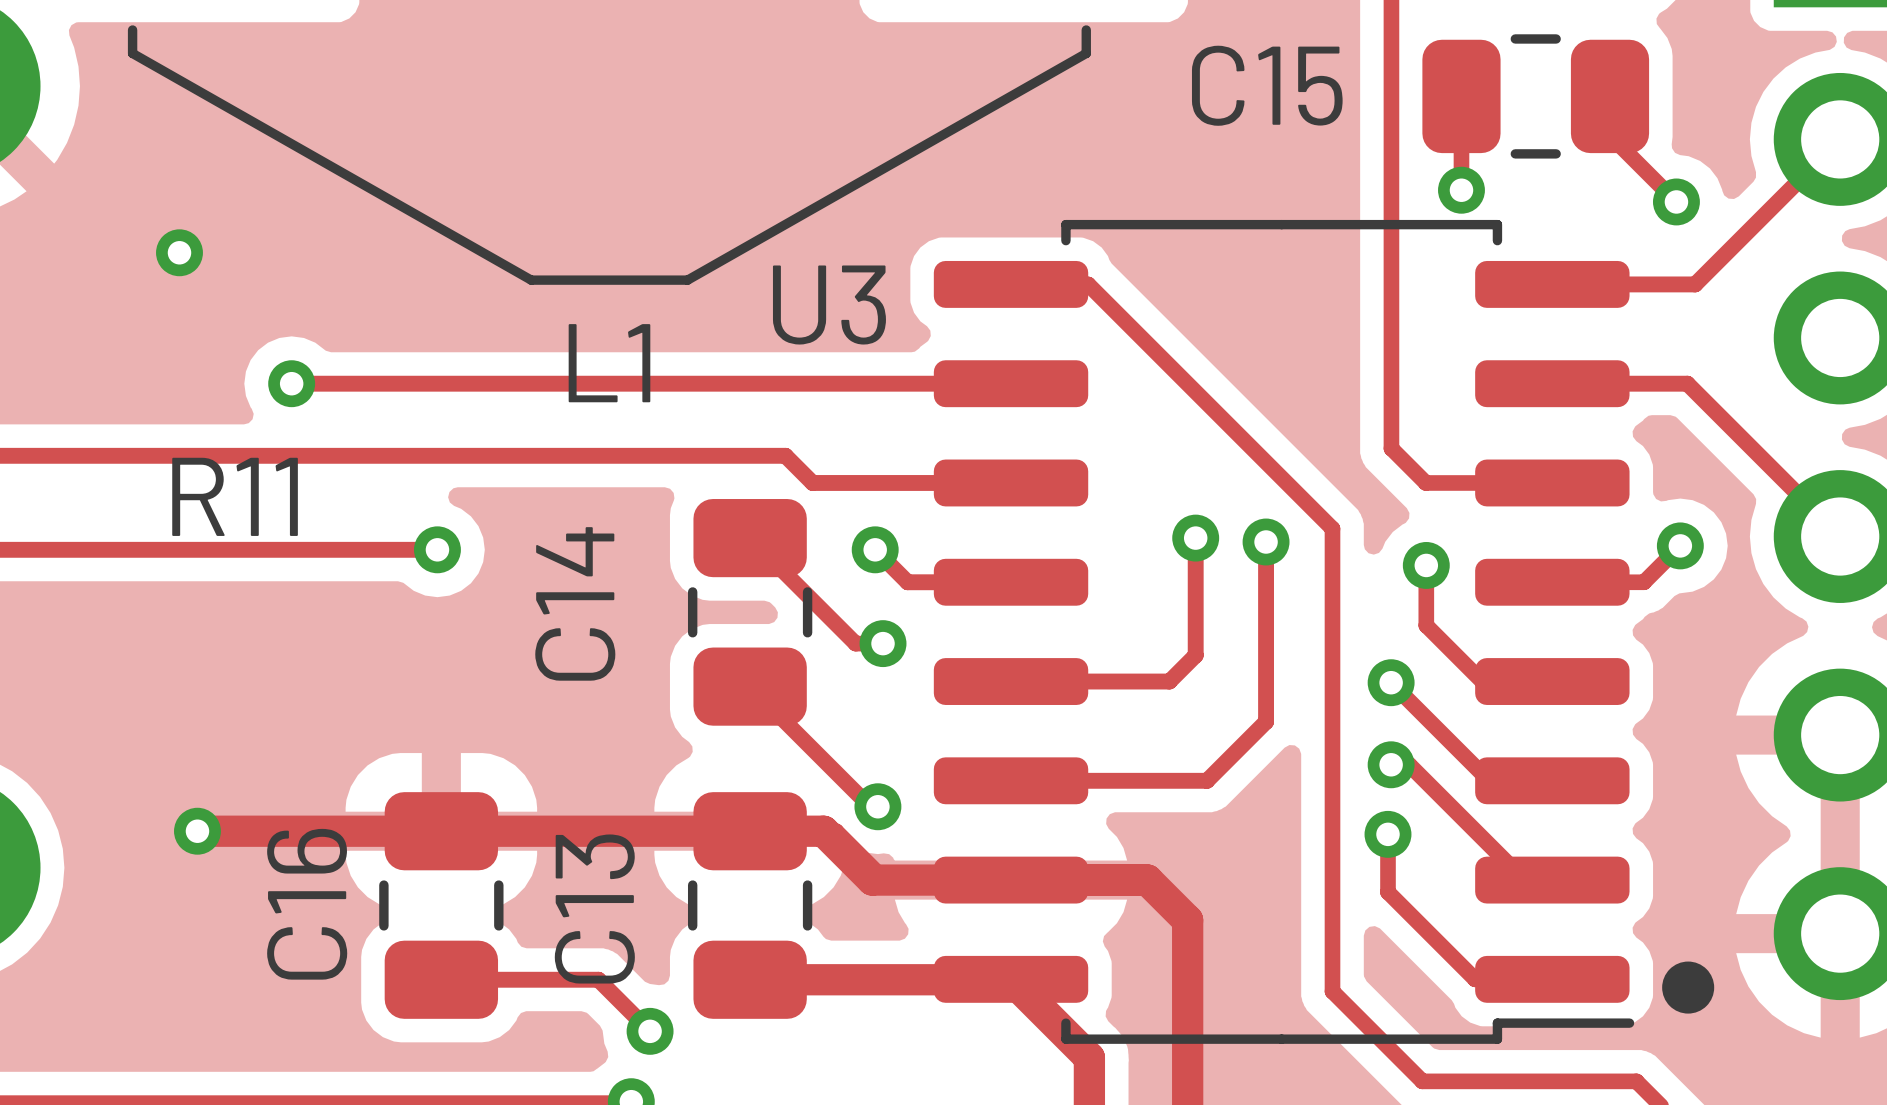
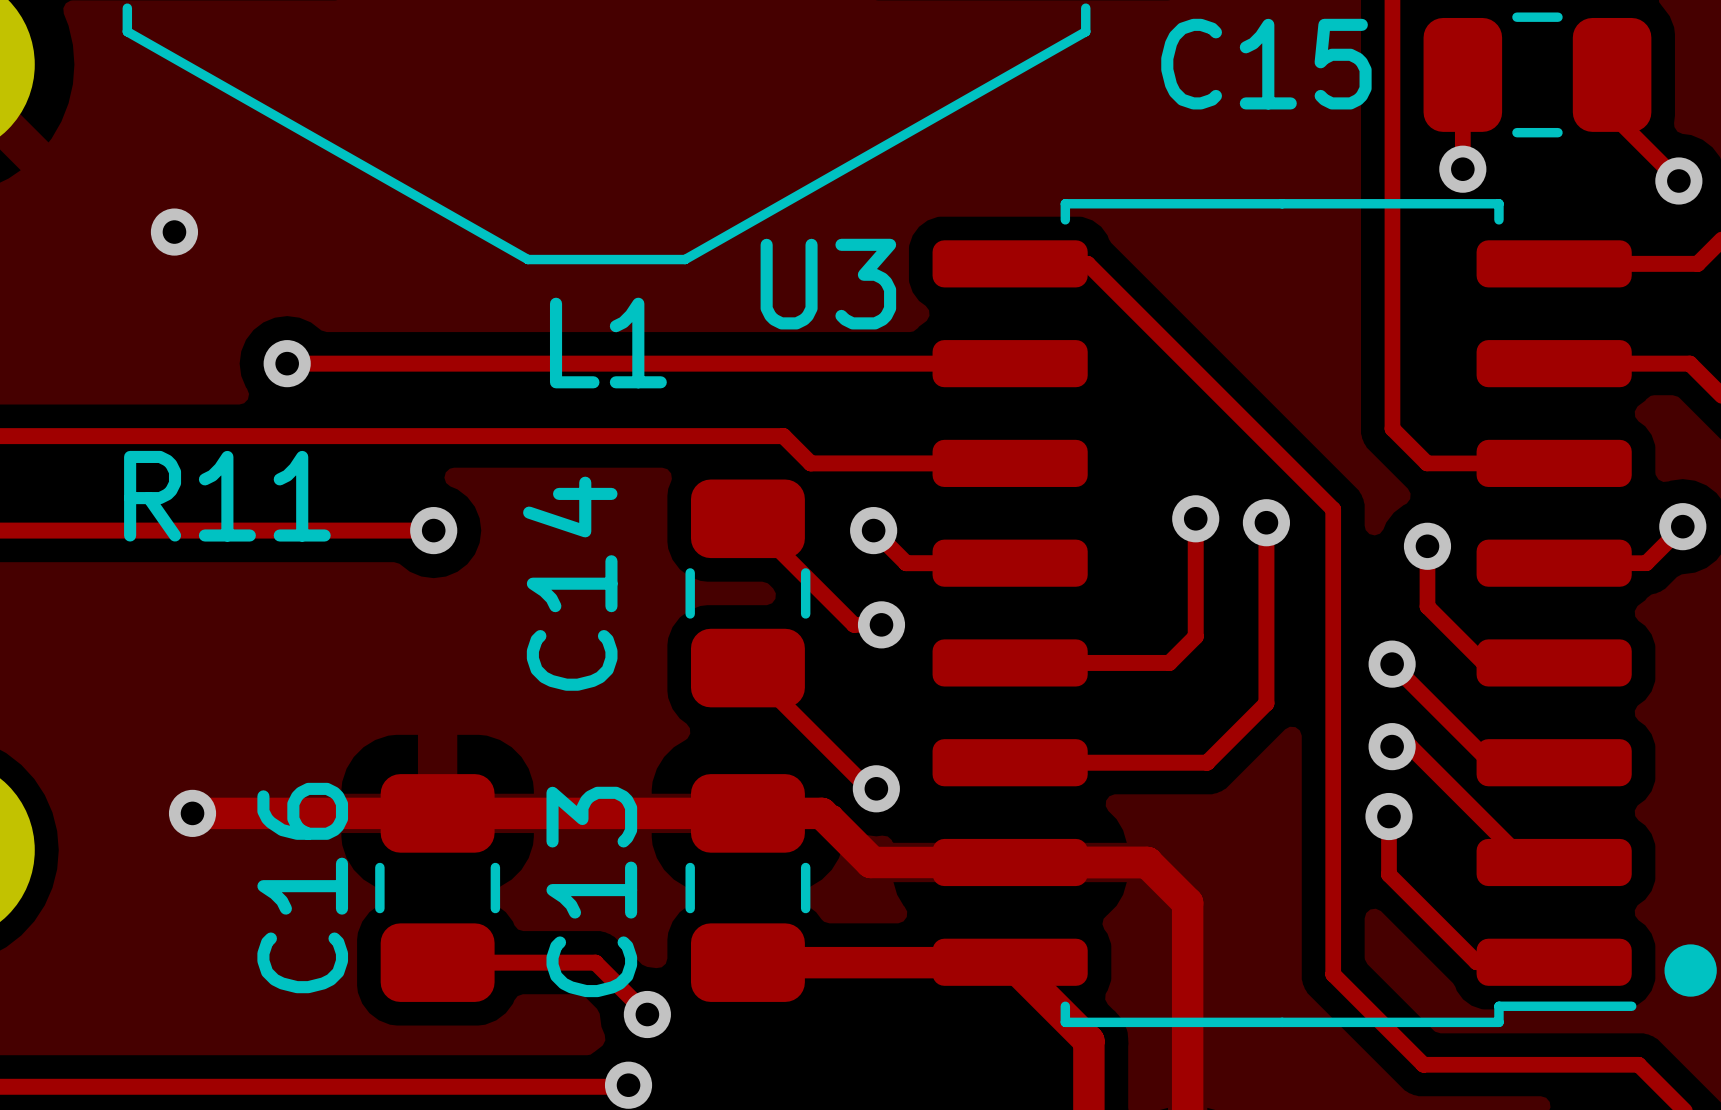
R11 name position: R11 (235, 496) -> R11 (227, 496)

